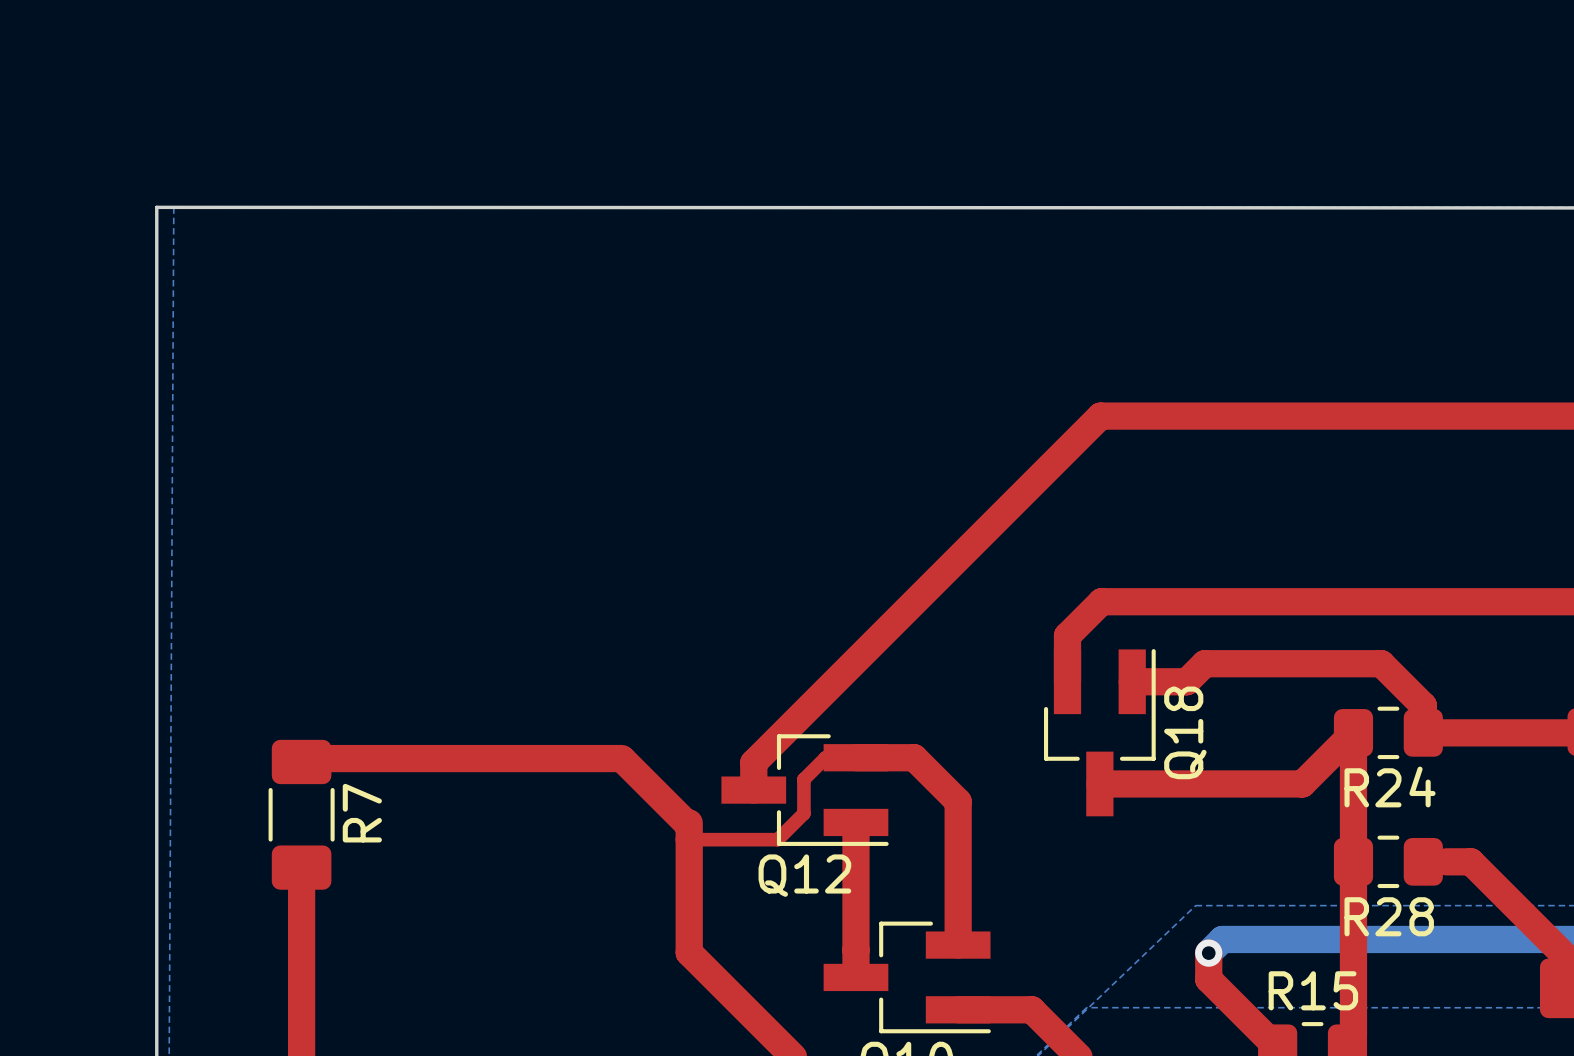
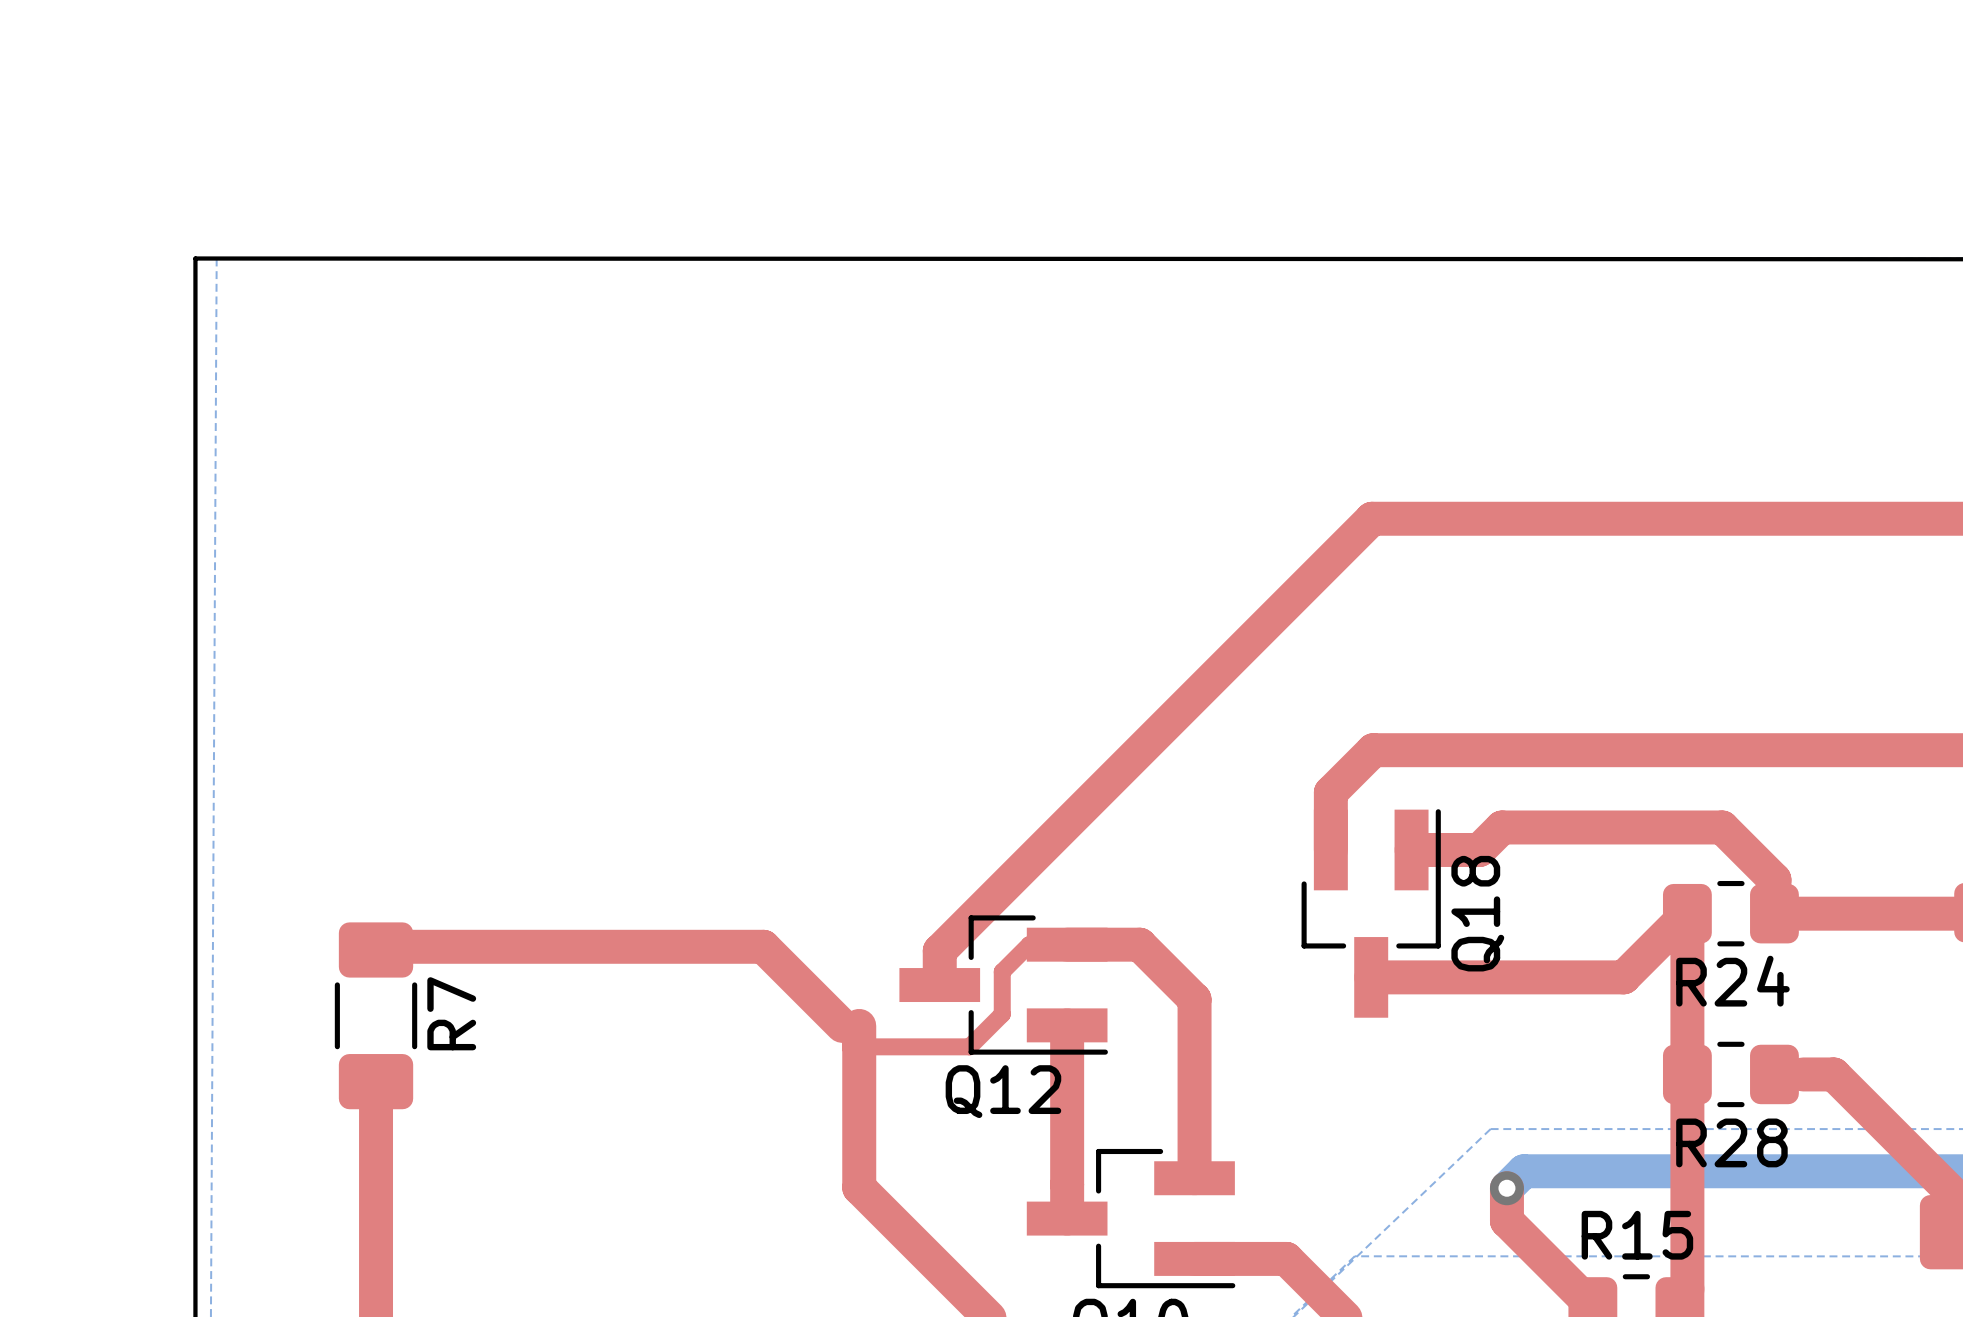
top track: (311, 758) (621, 758) -> none
top track: none -> (376, 946) (763, 946) (842, 1025)
top track: (623, 759) (686, 823) -> none

